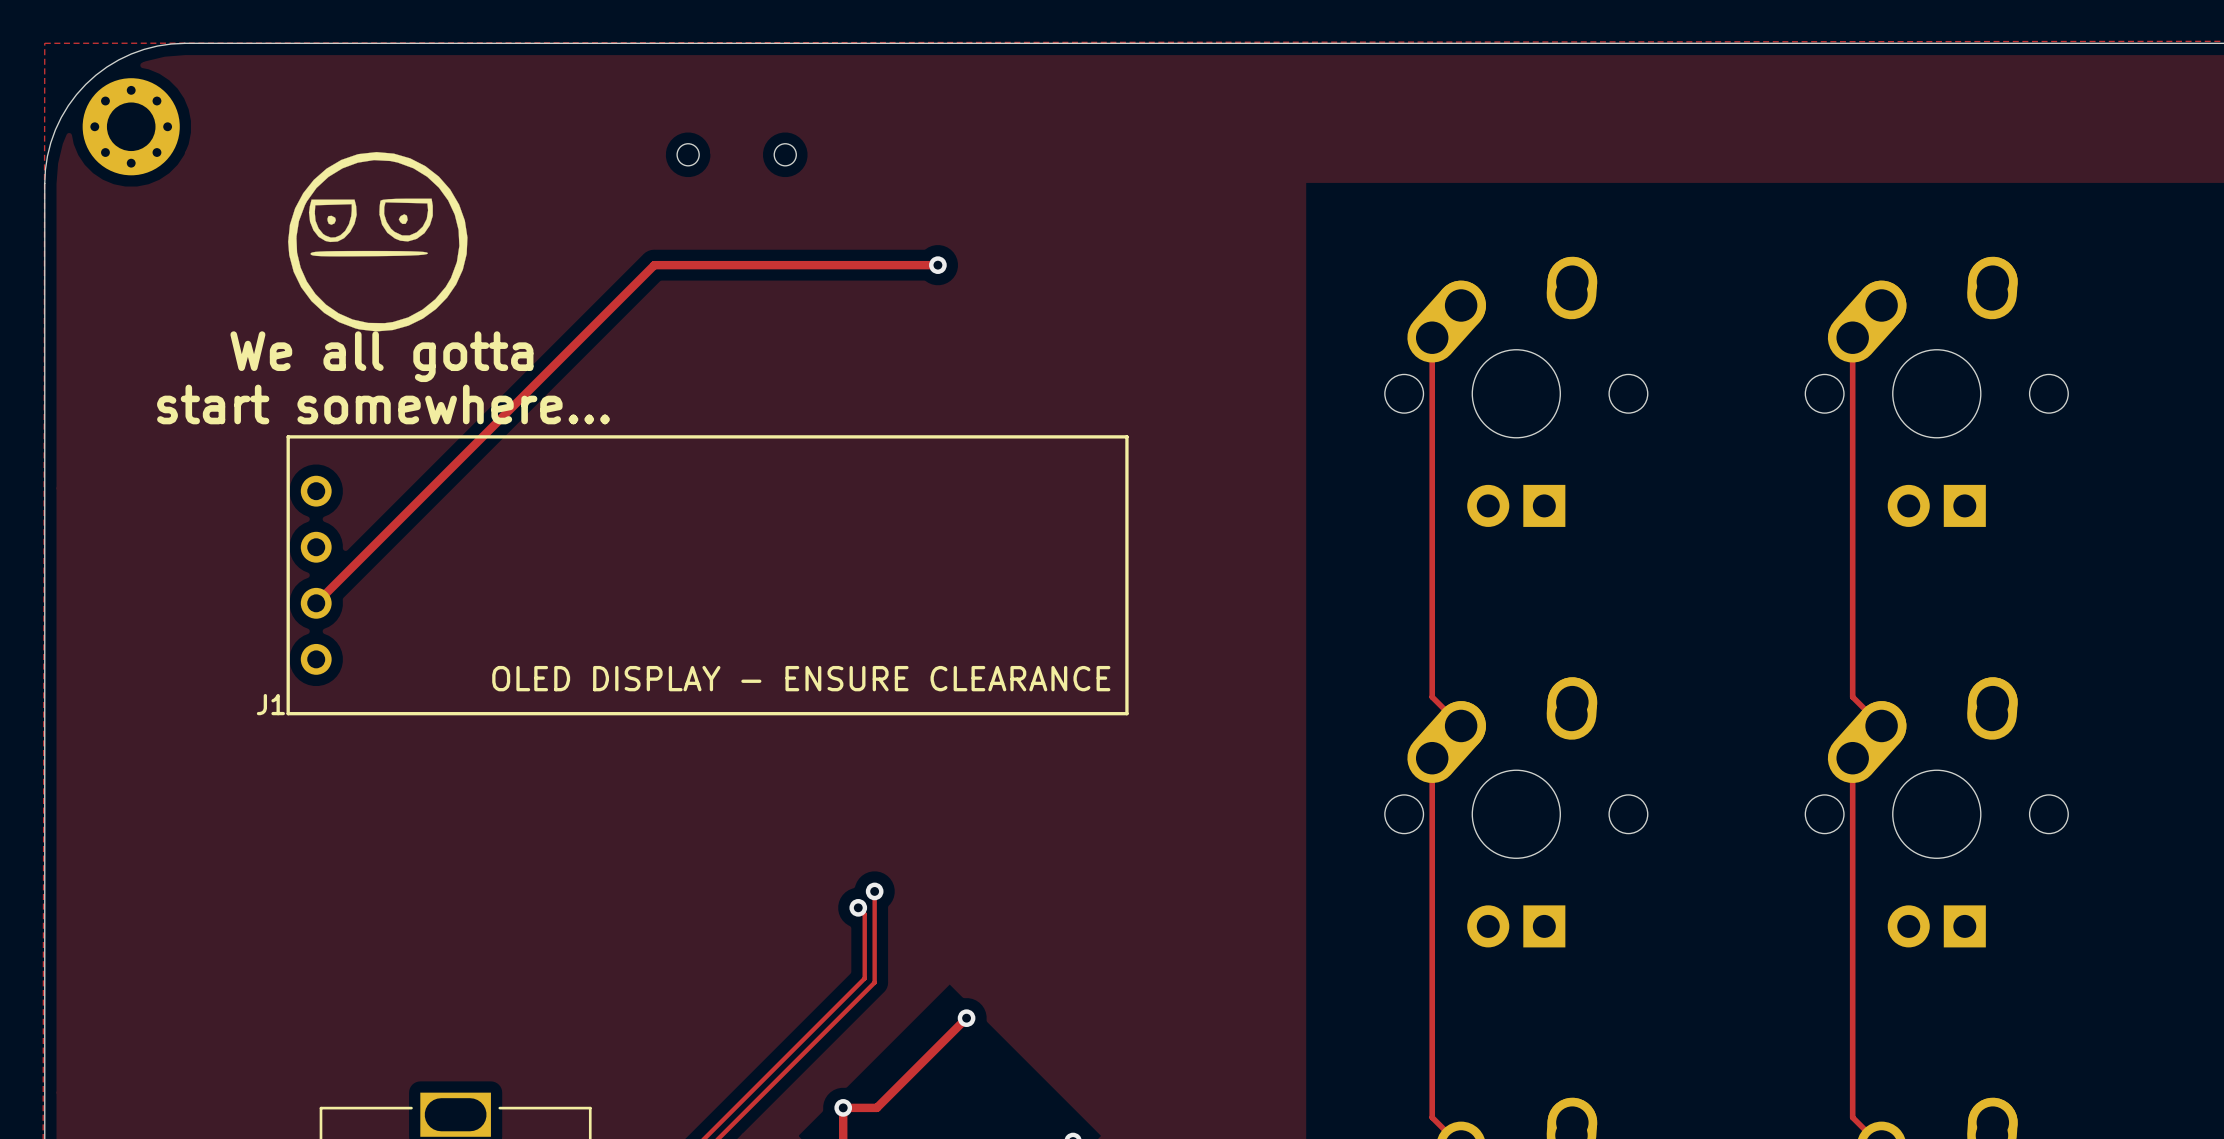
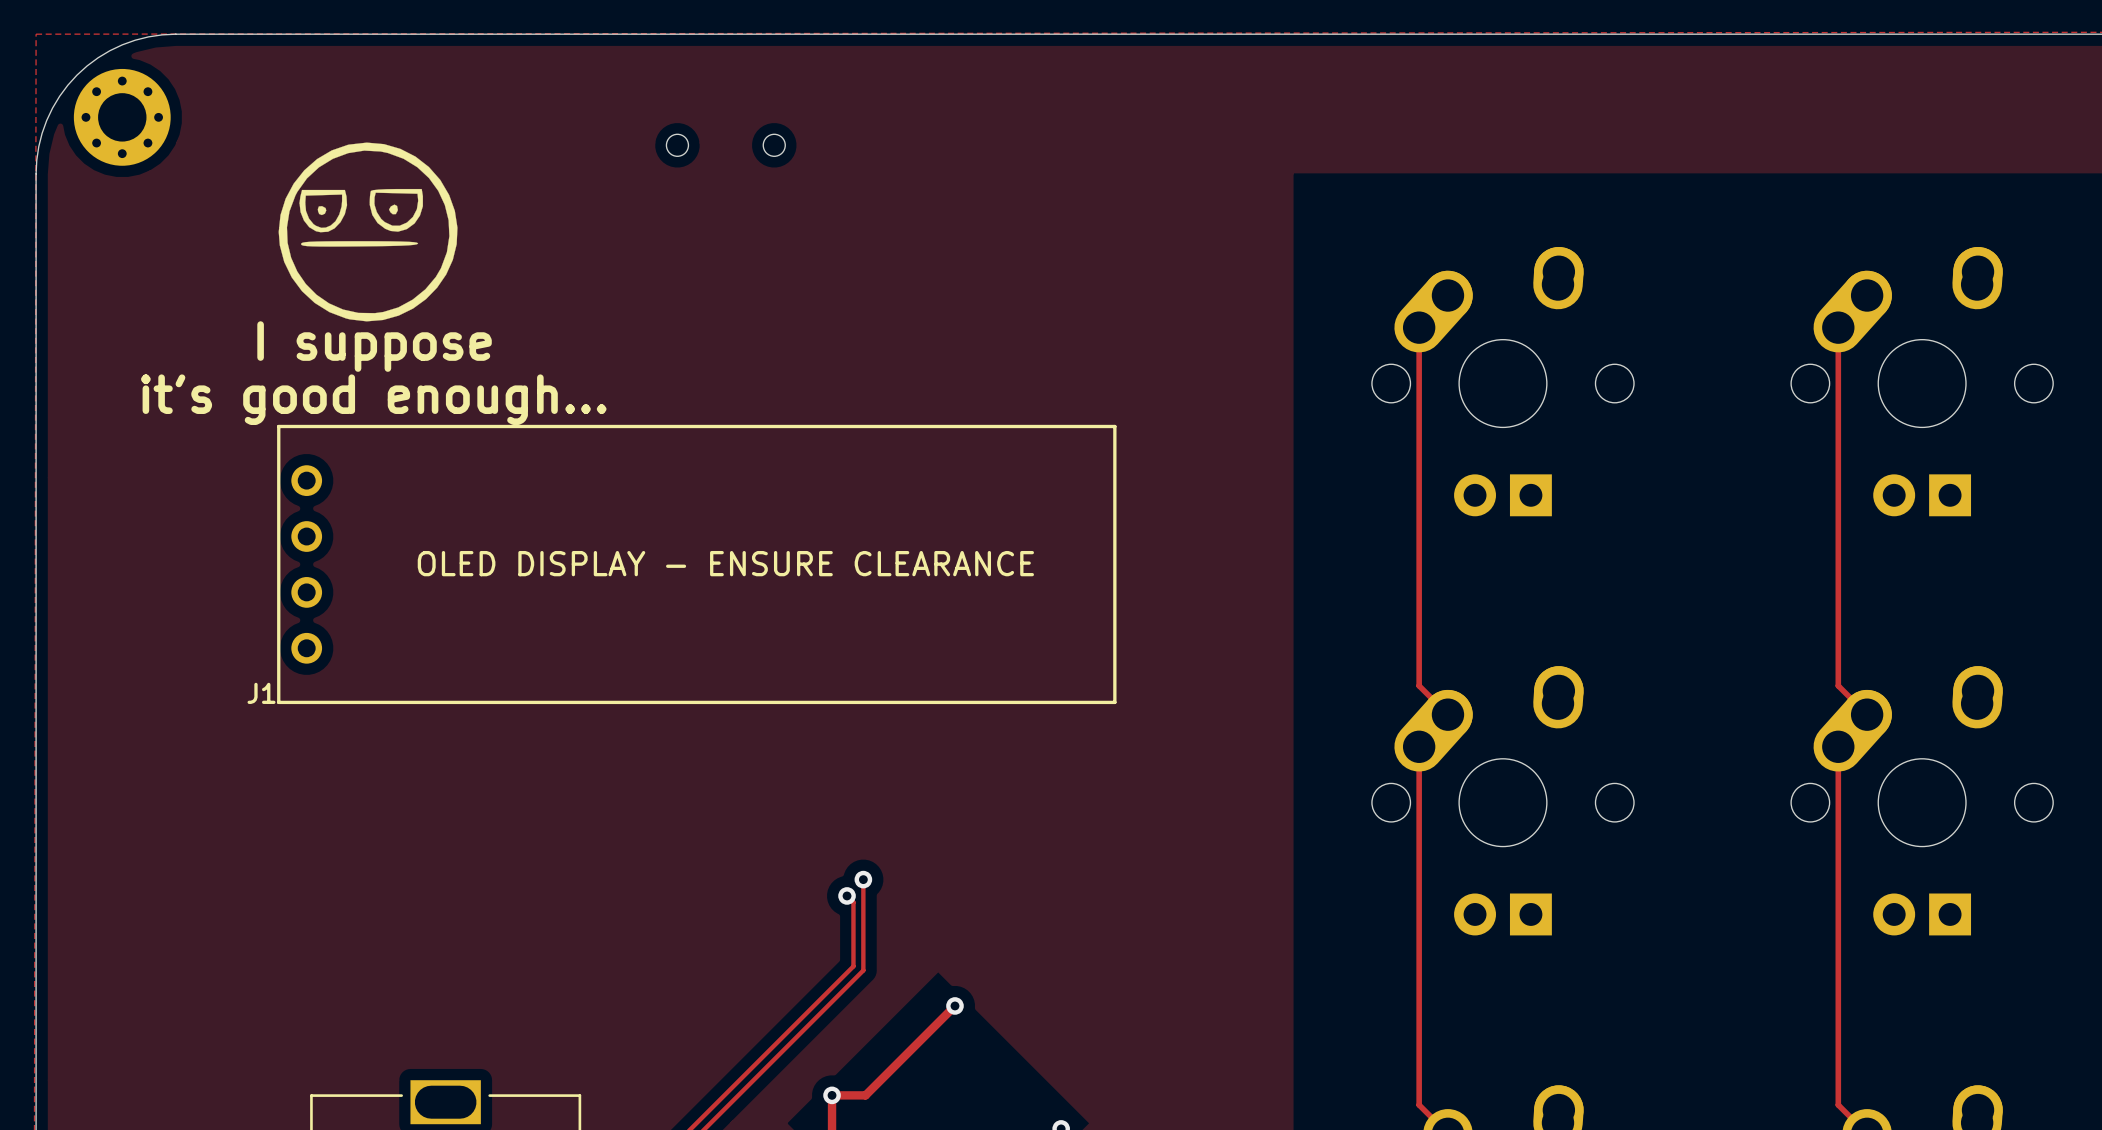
track: (937, 265) (654, 265) (316, 603) -> none
via: (937, 265) -> none
text: We all gotta (381, 356) -> I suppose (374, 346)
text: start somewhere... (383, 404) -> it's good enough... (373, 399)
J1 text position: OLED DISPLAY - ENSURE CLEARANCE (801, 678) -> OLED DISPLAY - ENSURE CLEARANCE (725, 563)

